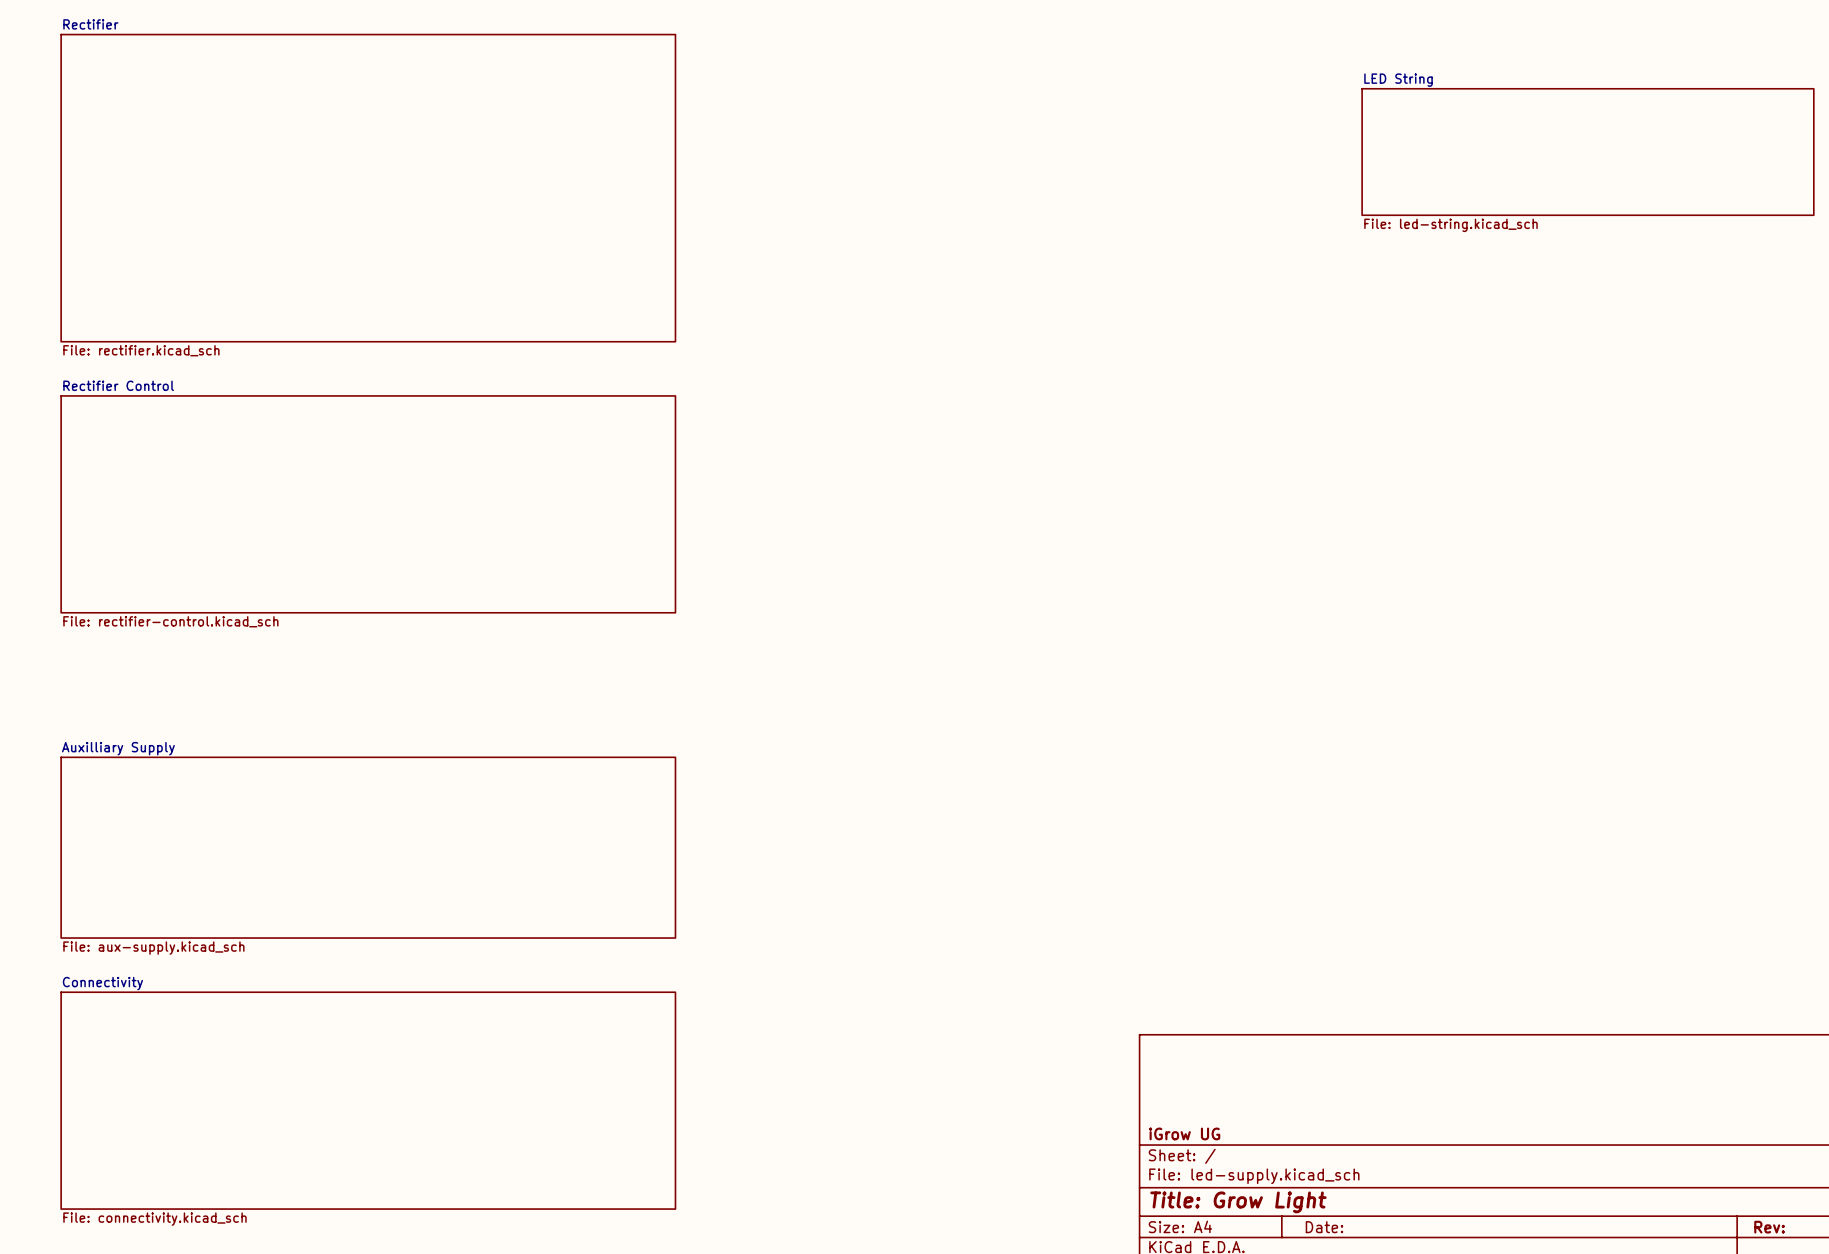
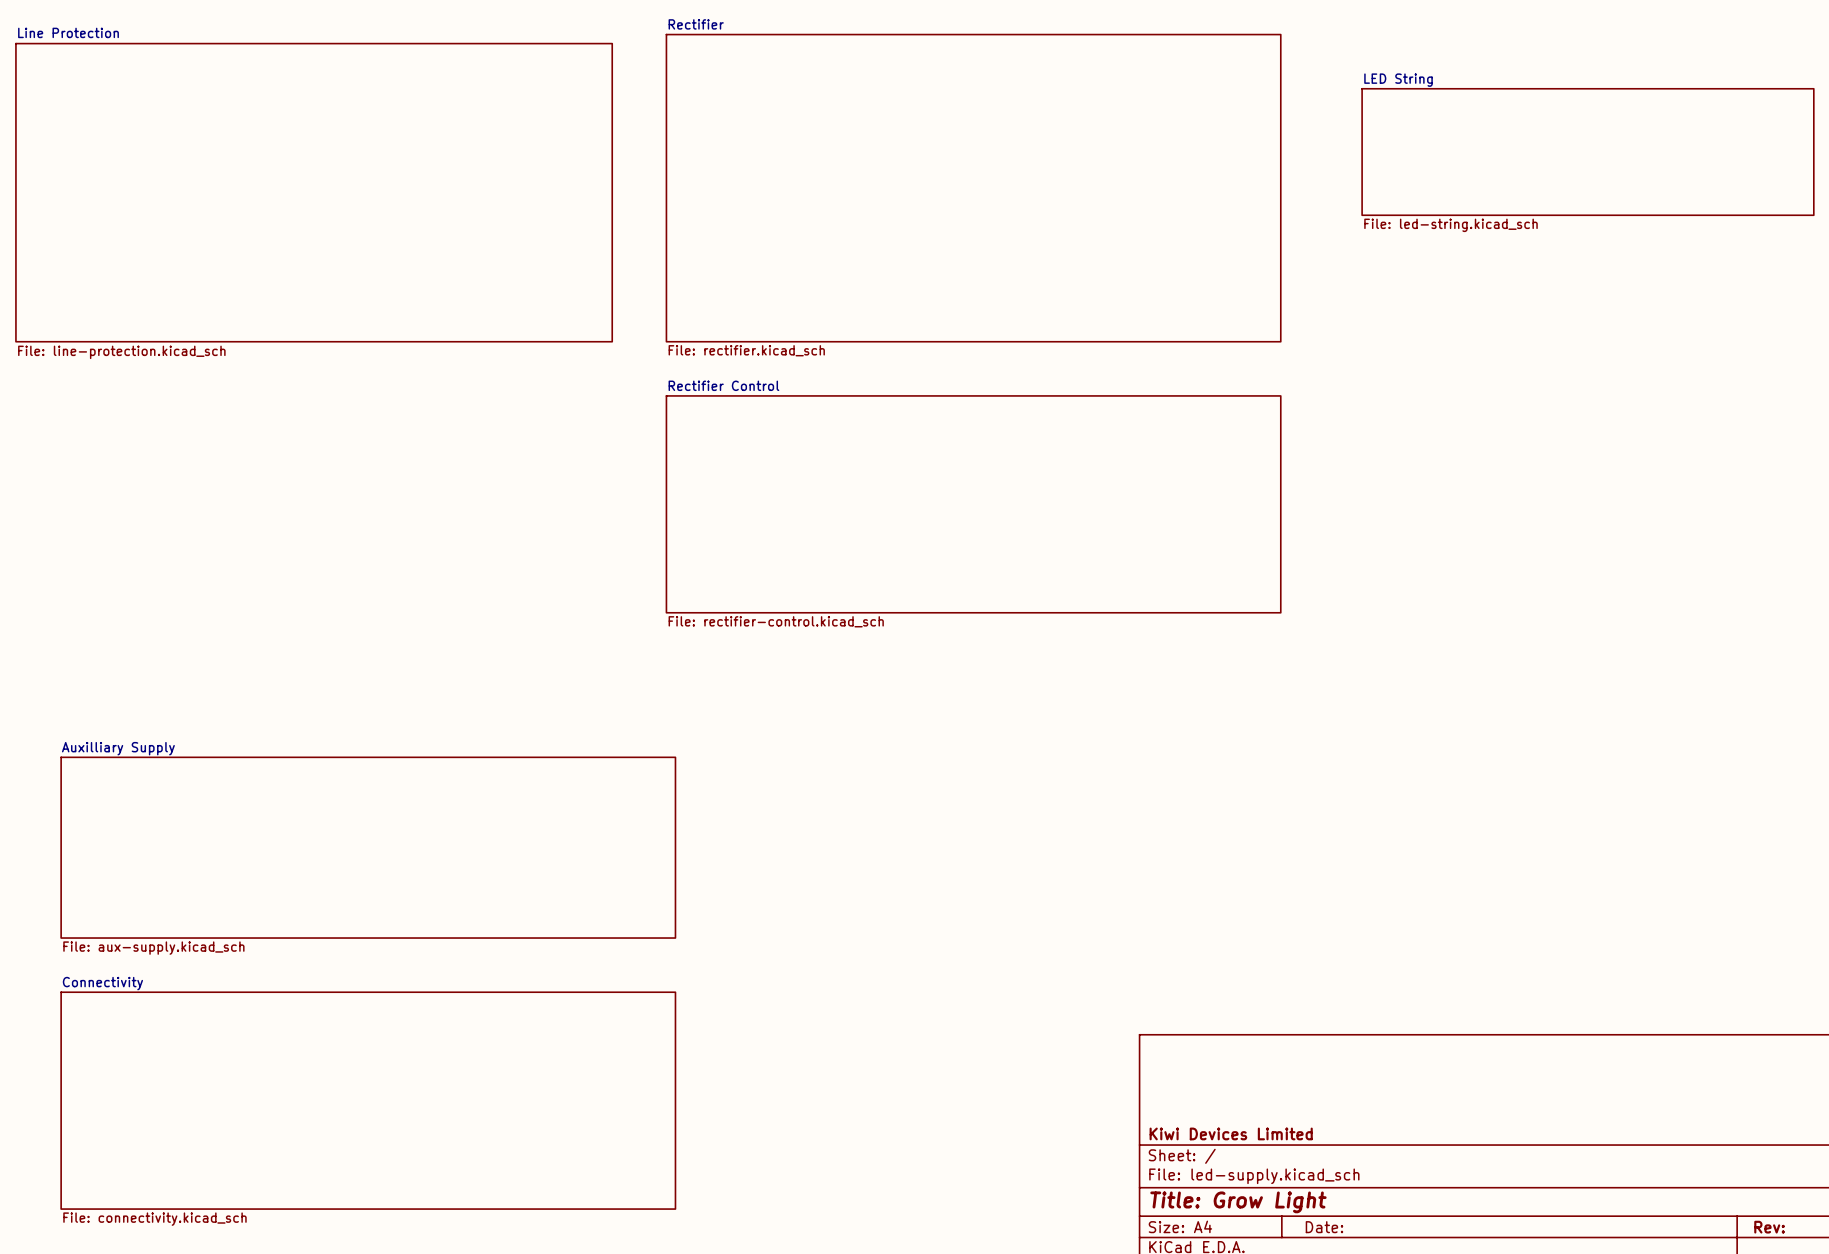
sheet Rectifier: File: rectifier.kicad_sch (368, 188) -> none
sheet Rectifier: none -> File: rectifier.kicad_sch (973, 188)
sheet Line Protection: none -> File: line-protection.kicad_sch (314, 192)
sheet Rectifier Control: File: rectifier-control.kicad_sch (368, 504) -> none
sheet Rectifier Control: none -> File: rectifier-control.kicad_sch (973, 504)
title block: iGrow UG (1184, 1133) -> Kiwi Devices Limited (1231, 1133)

